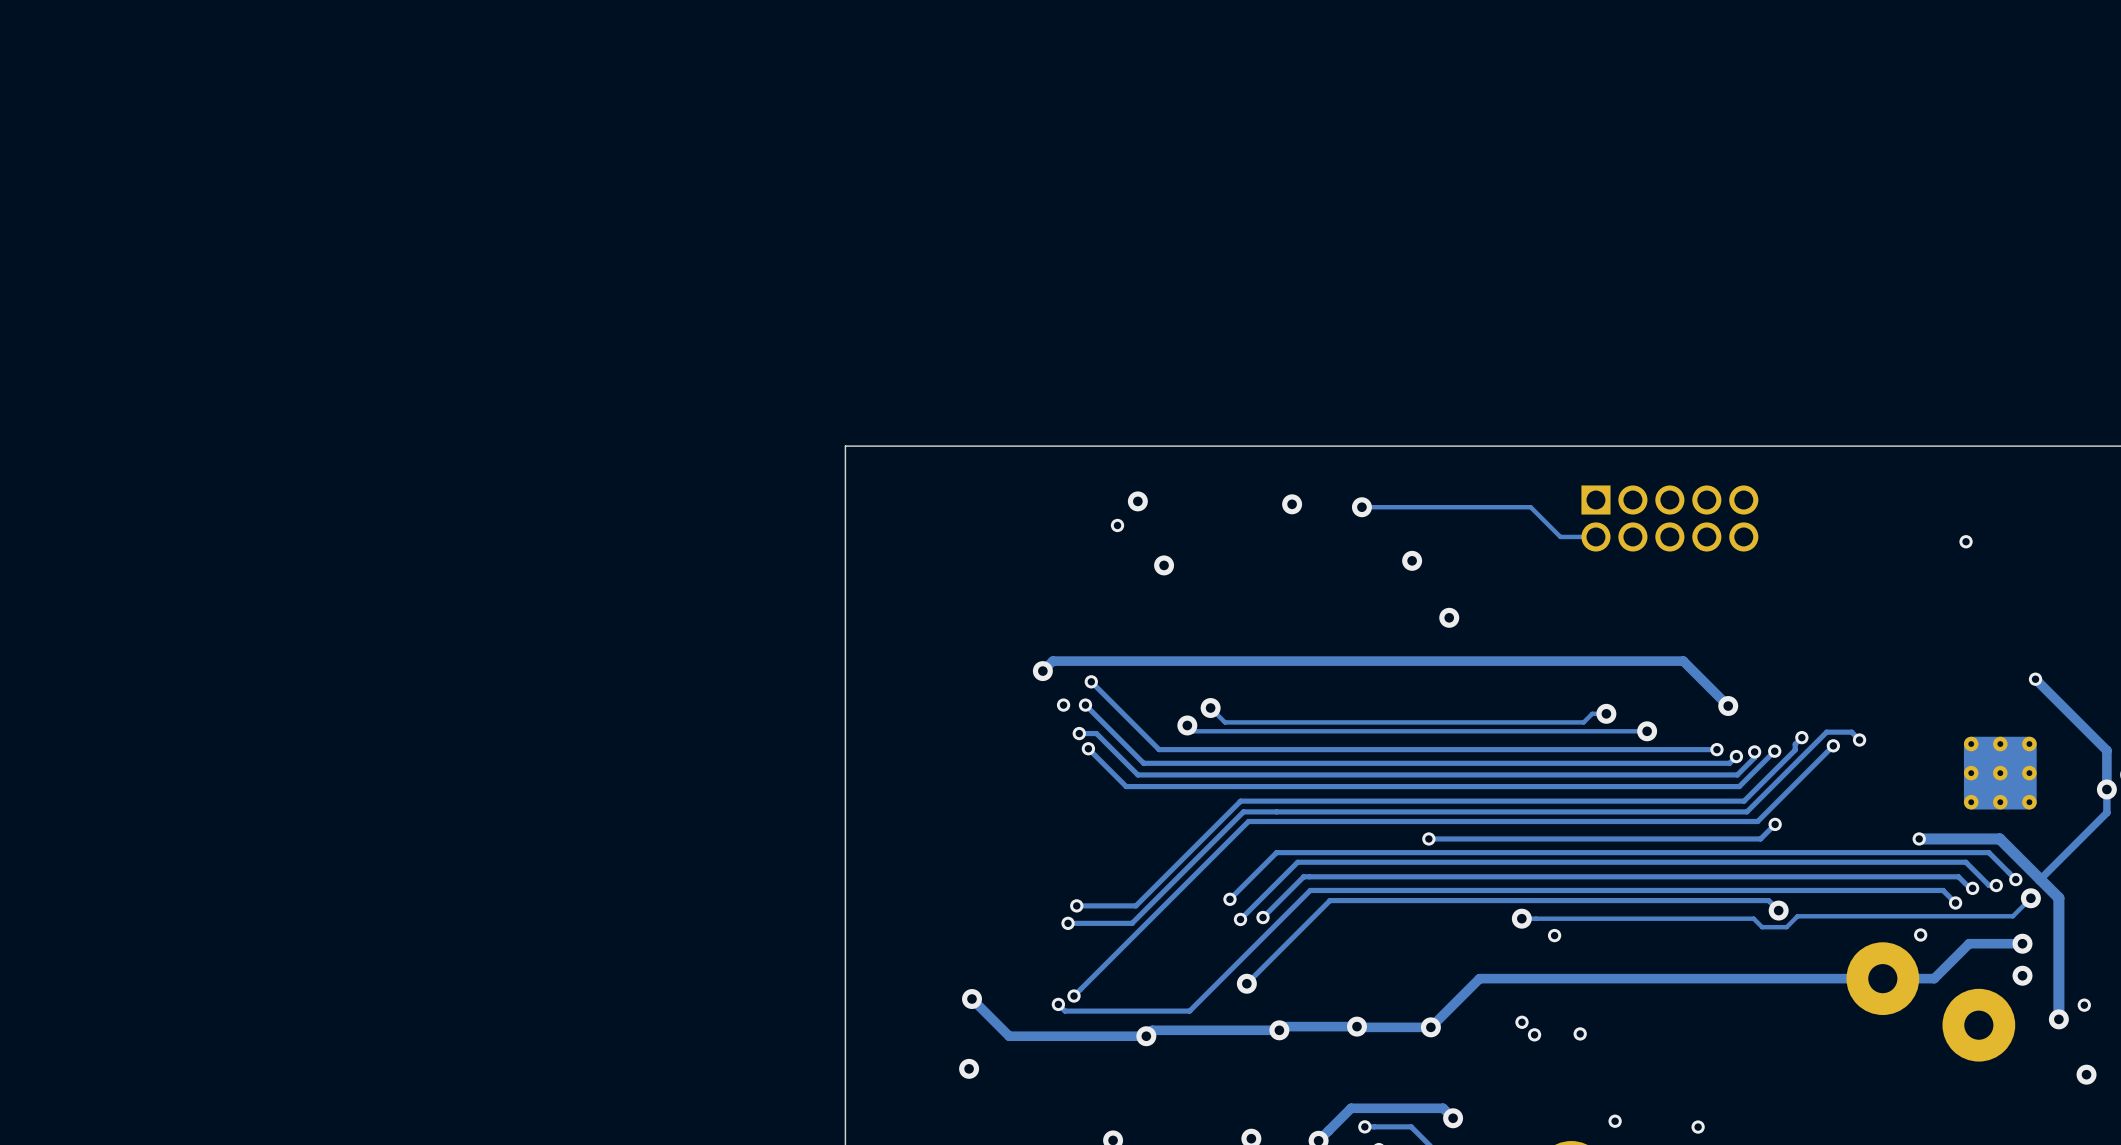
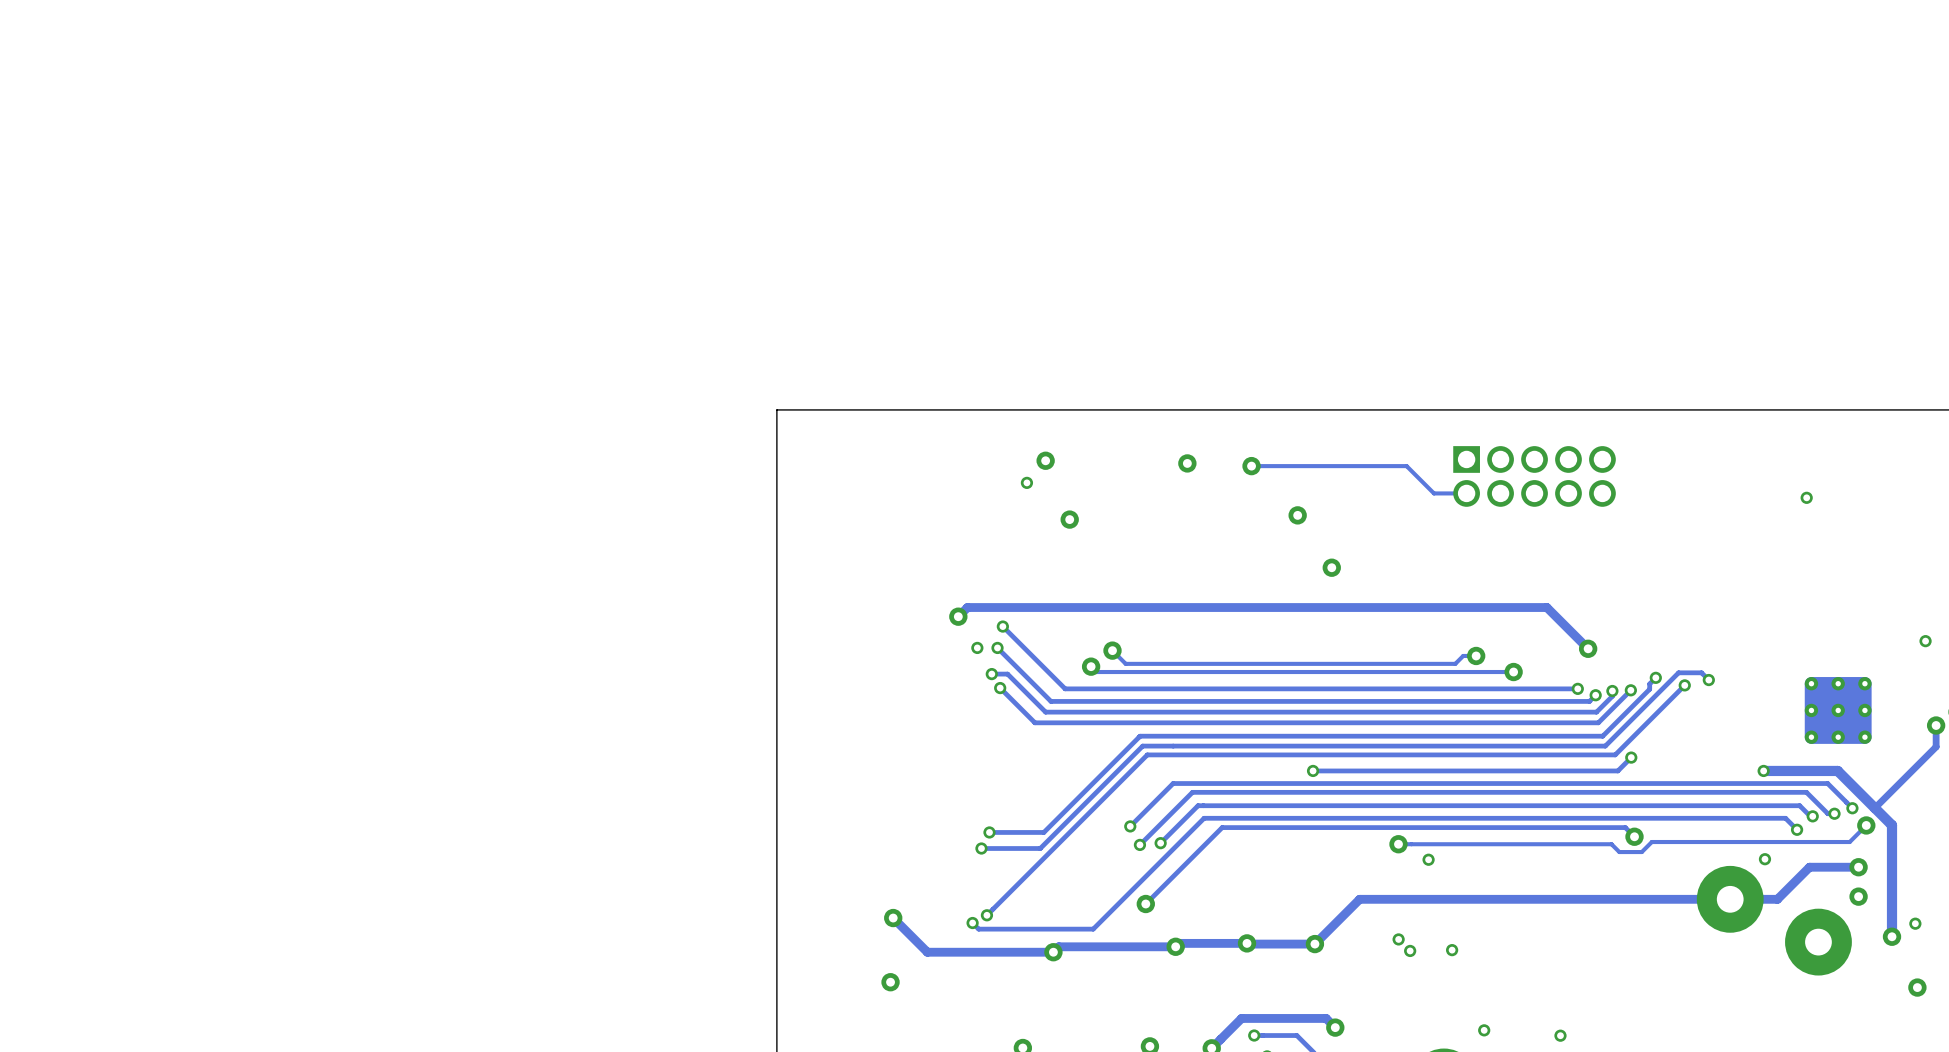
track: (2035, 679) (2106, 750) (2106, 789) -> none
via position: (2035, 679) -> (1925, 641)

